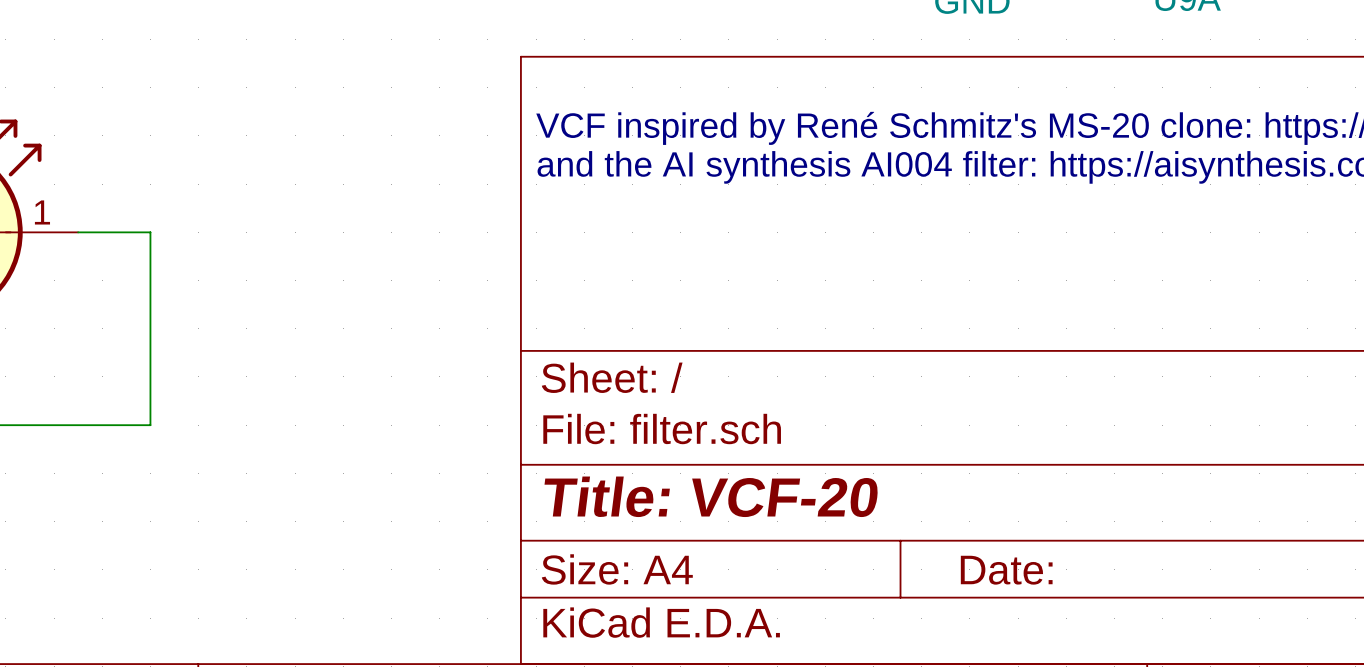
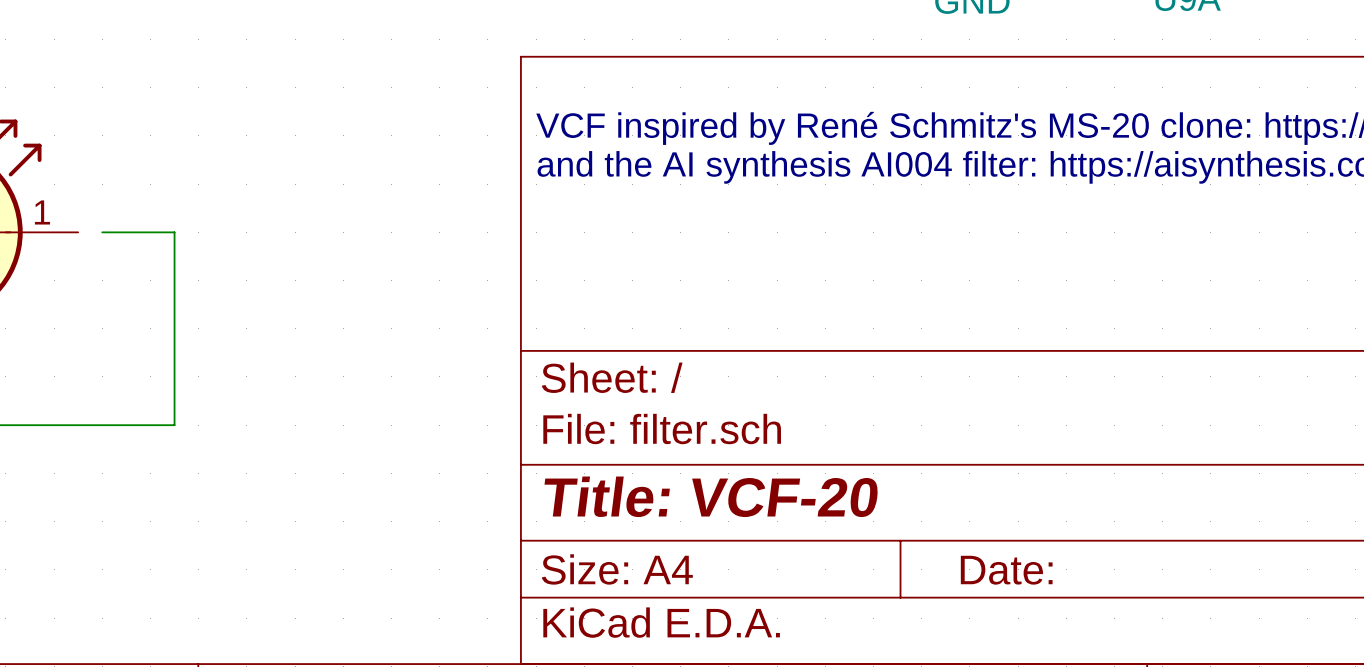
wire: (78, 232) (102, 232) -> none
wire: (150, 232) (150, 425) -> (150, 232) (174, 232) (174, 425) (150, 425)

